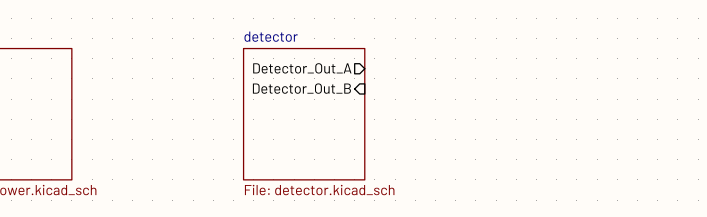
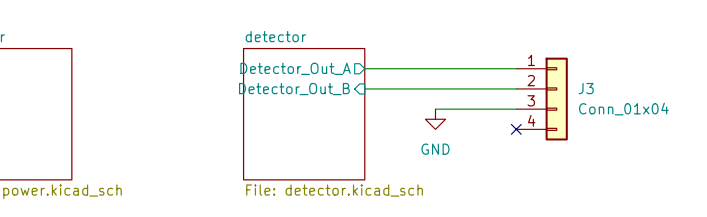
wire: none -> (364, 68) (516, 68)
wire: none -> (364, 88) (516, 88)
J3: none -> Conn_01x04 (542, 99)
wire: none -> (435, 109) (516, 109)
power symbol: none -> GND (435, 119)
no-connect mark: none -> (516, 129)

